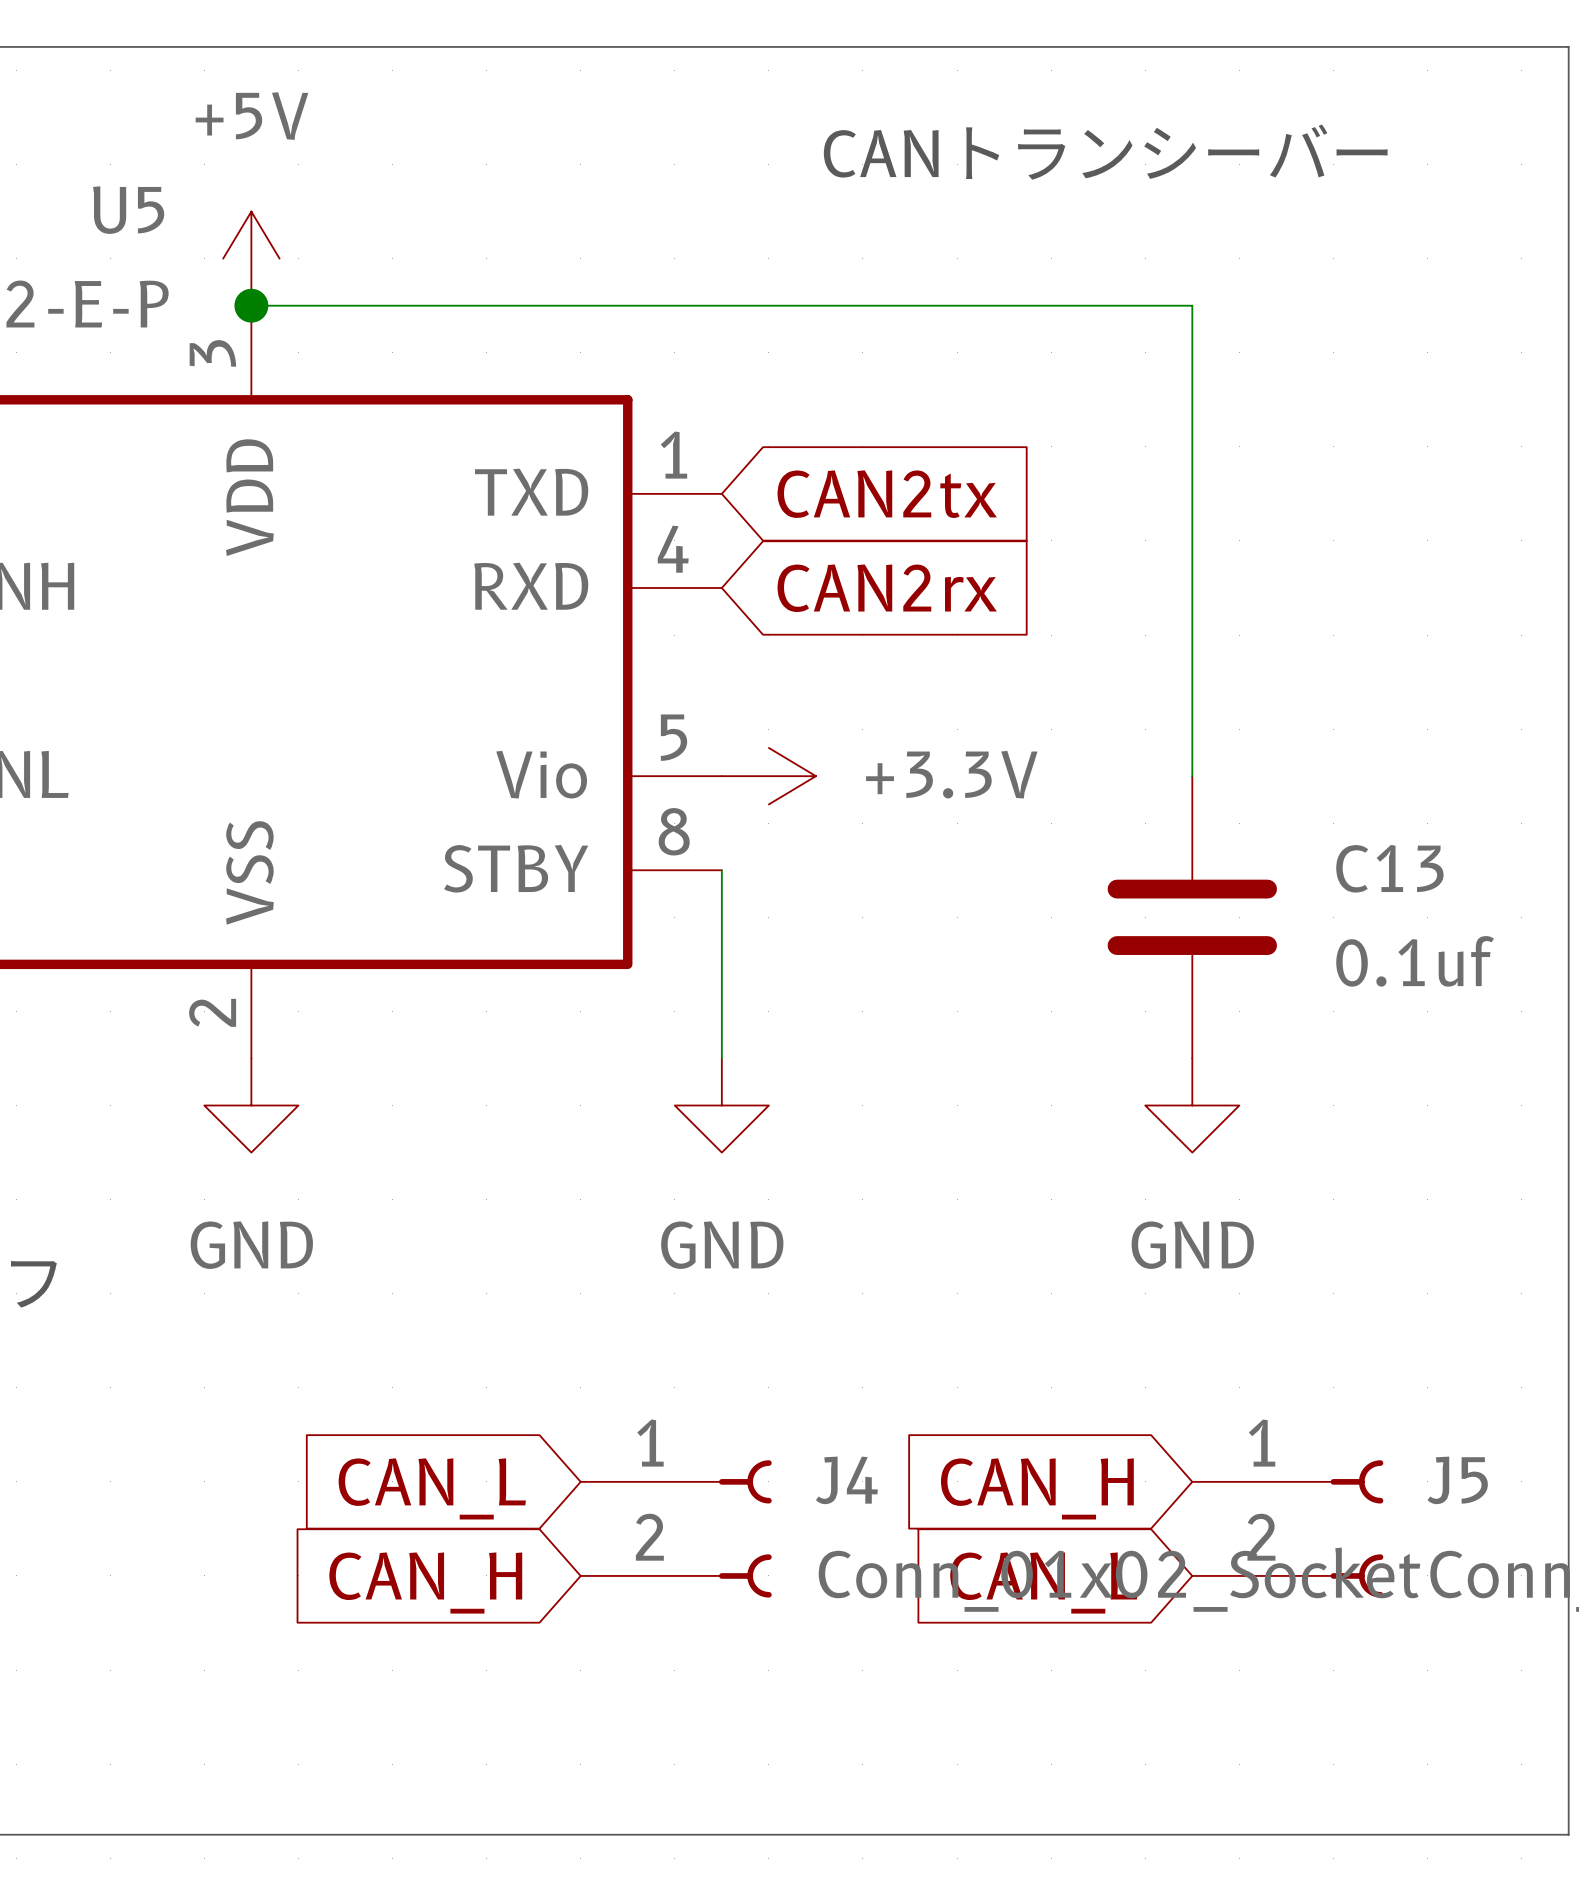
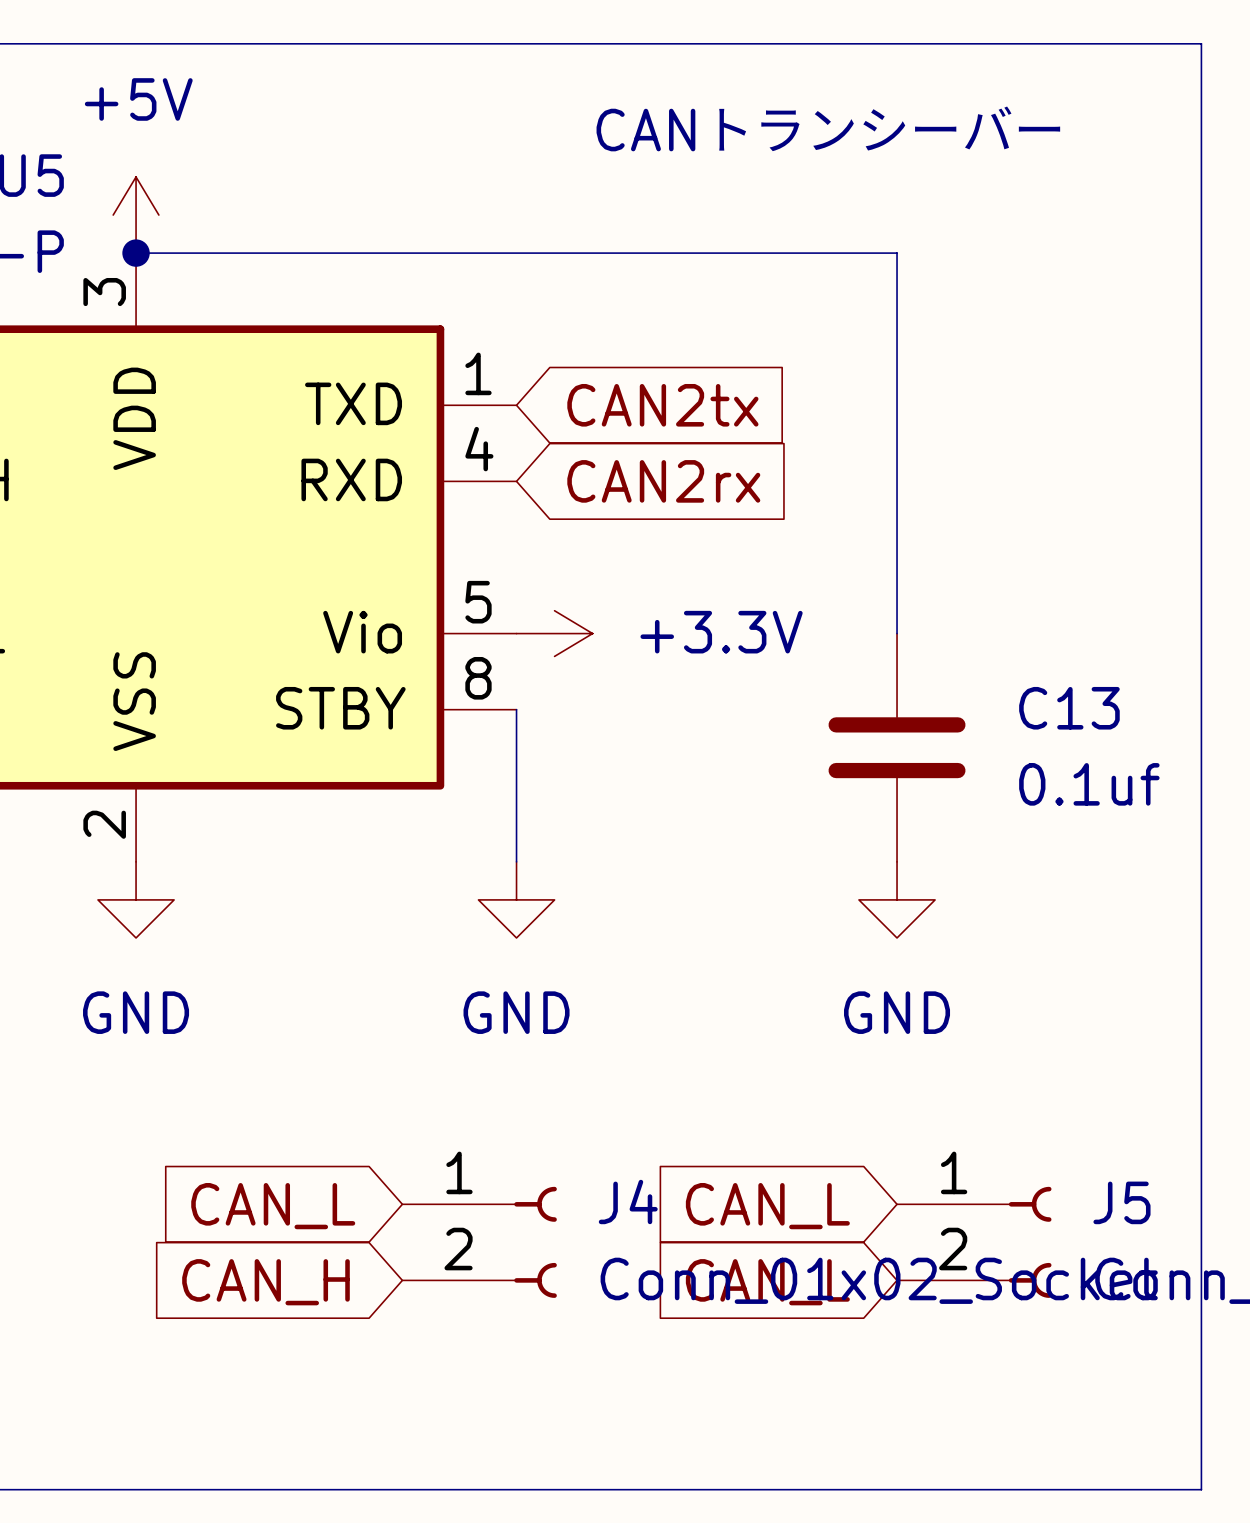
global label: CAN_H (1037, 1488) -> CAN_L (767, 1206)

